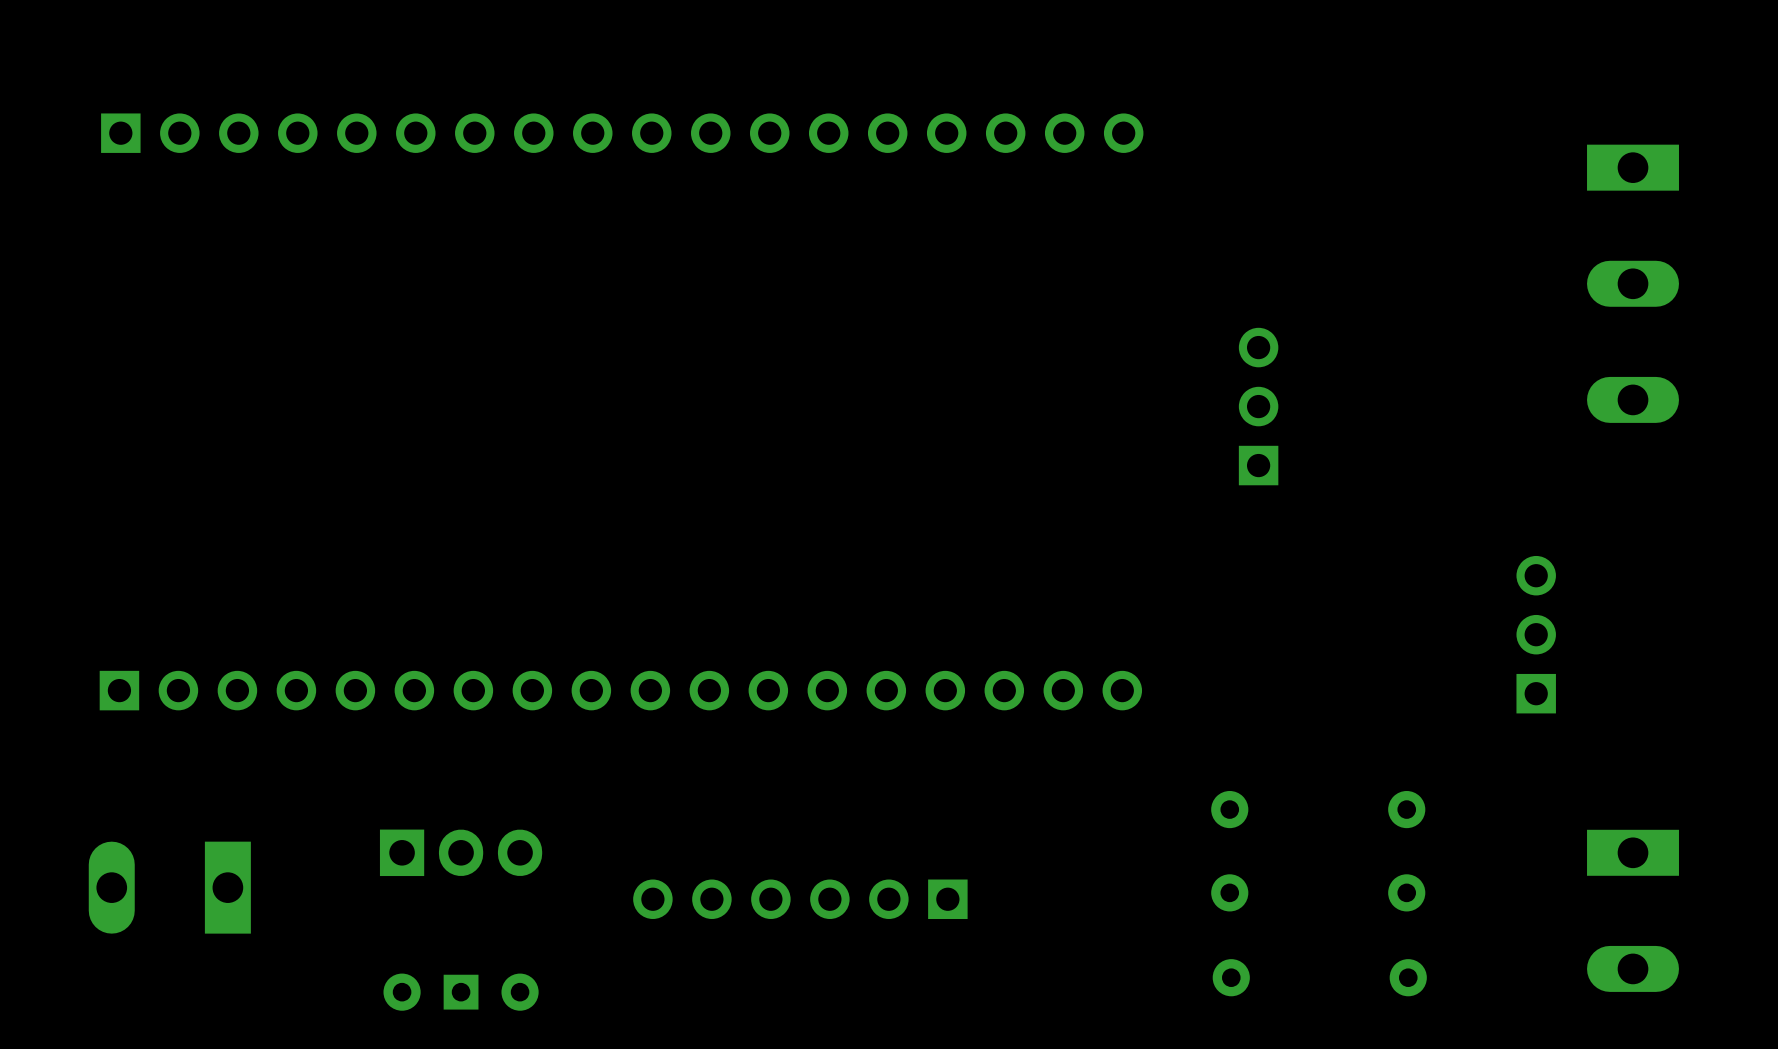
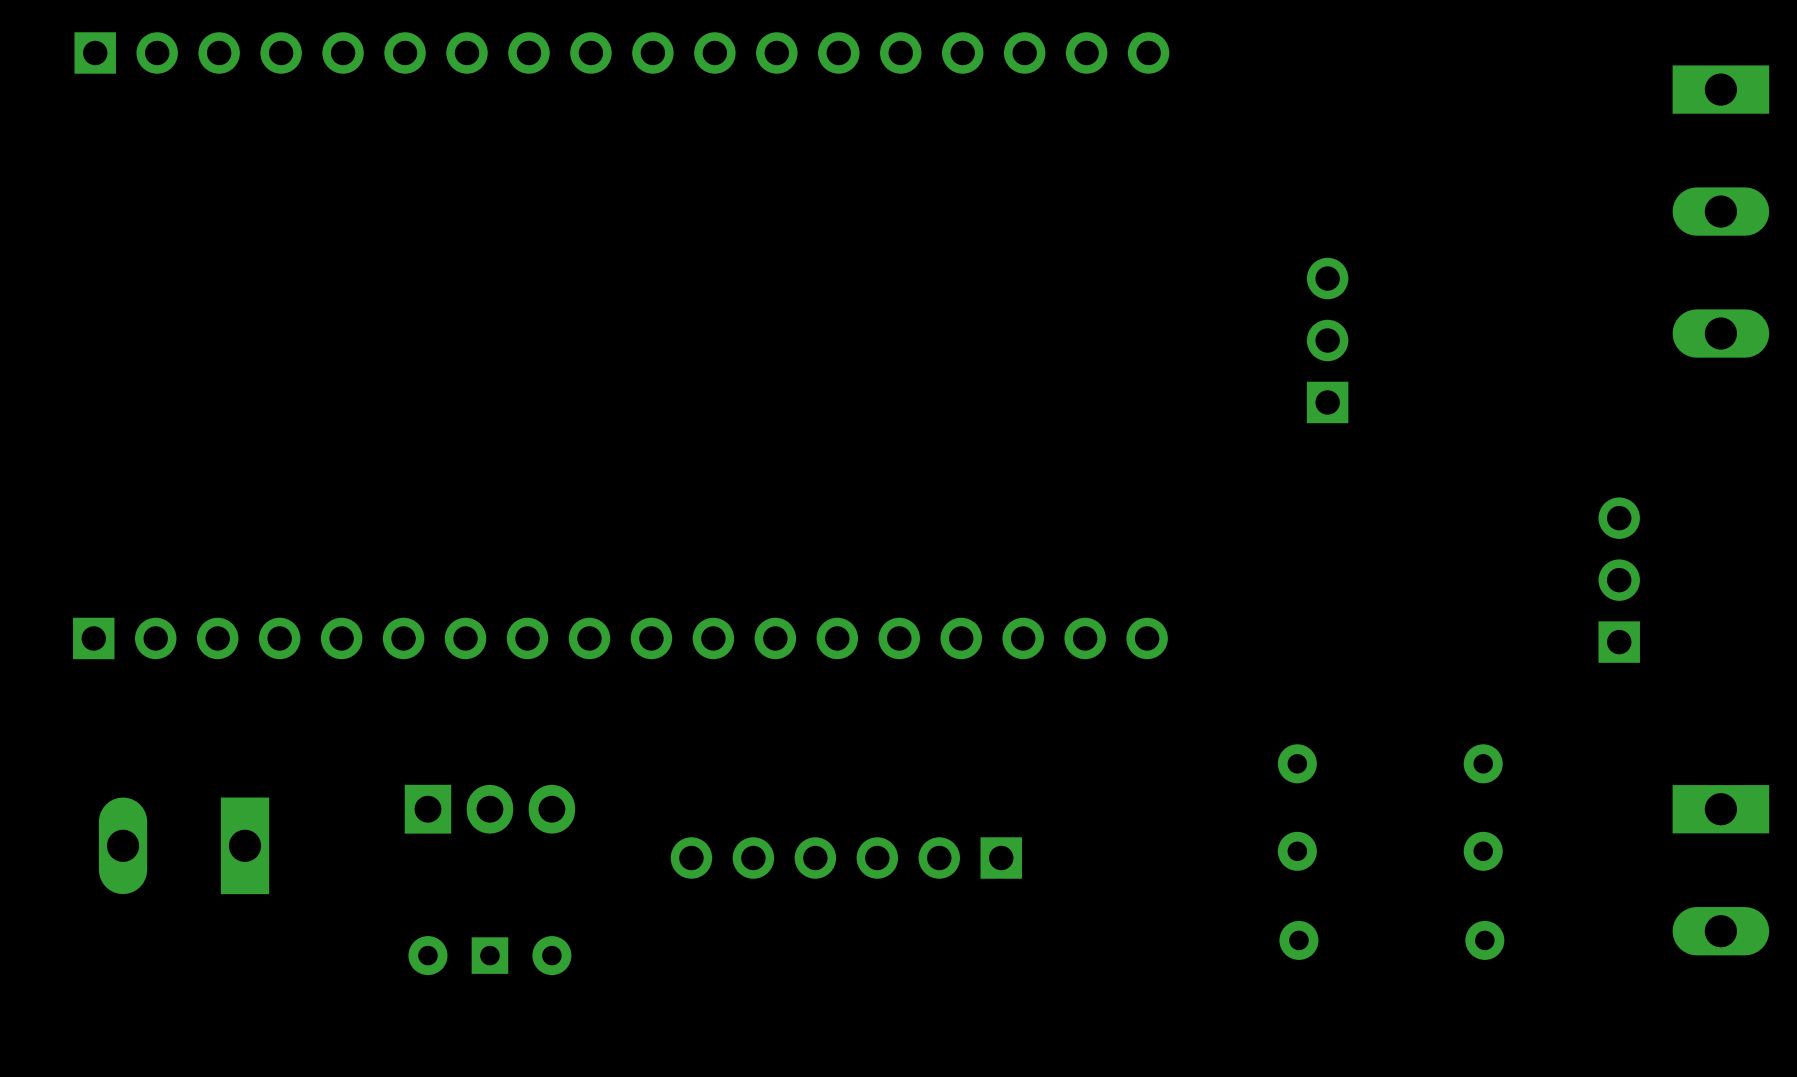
part position: (622, 133) -> (621, 52)
part position: (620, 690) -> (620, 638)

